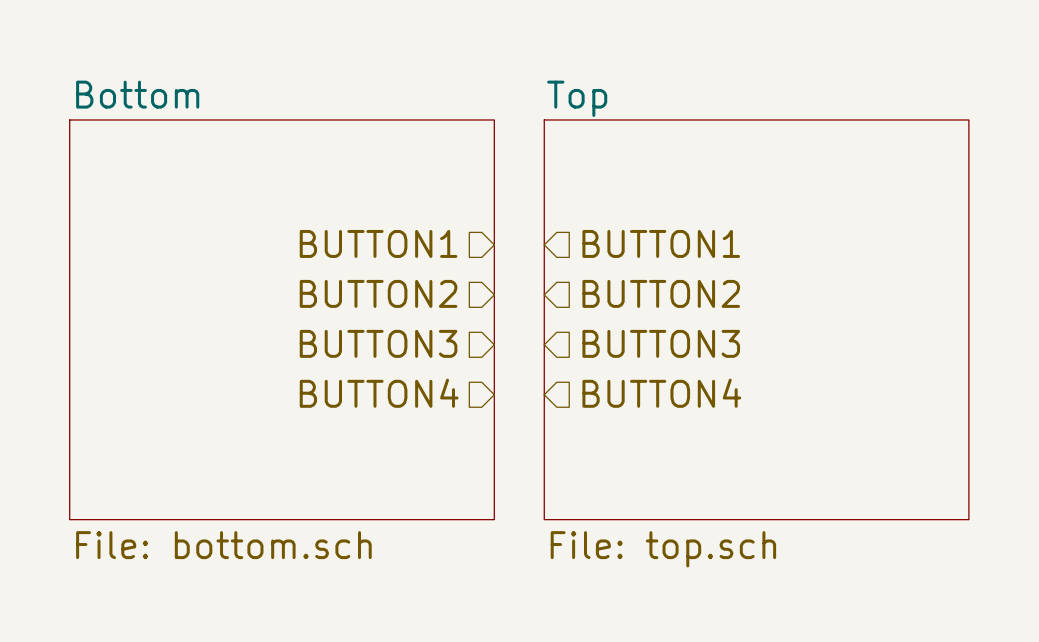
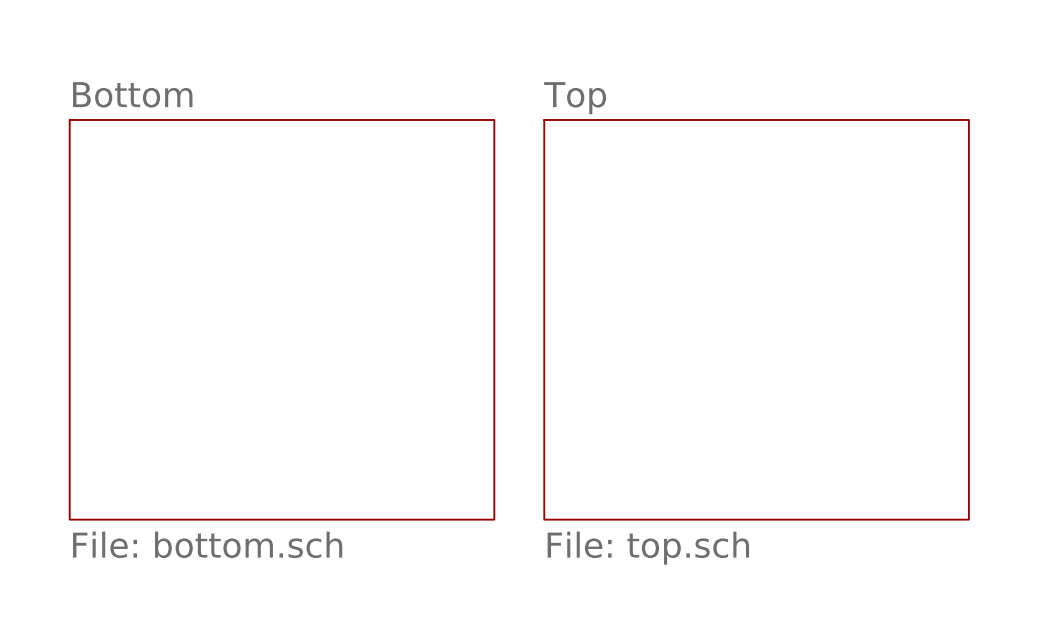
hierarchical label: BUTTON1 (378, 243) -> none
hierarchical label: BUTTON1 (661, 243) -> none
hierarchical label: BUTTON2 (378, 293) -> none
hierarchical label: BUTTON2 (661, 293) -> none
hierarchical label: BUTTON3 (378, 343) -> none
hierarchical label: BUTTON3 (661, 343) -> none
hierarchical label: BUTTON4 (379, 393) -> none
hierarchical label: BUTTON4 (661, 393) -> none

